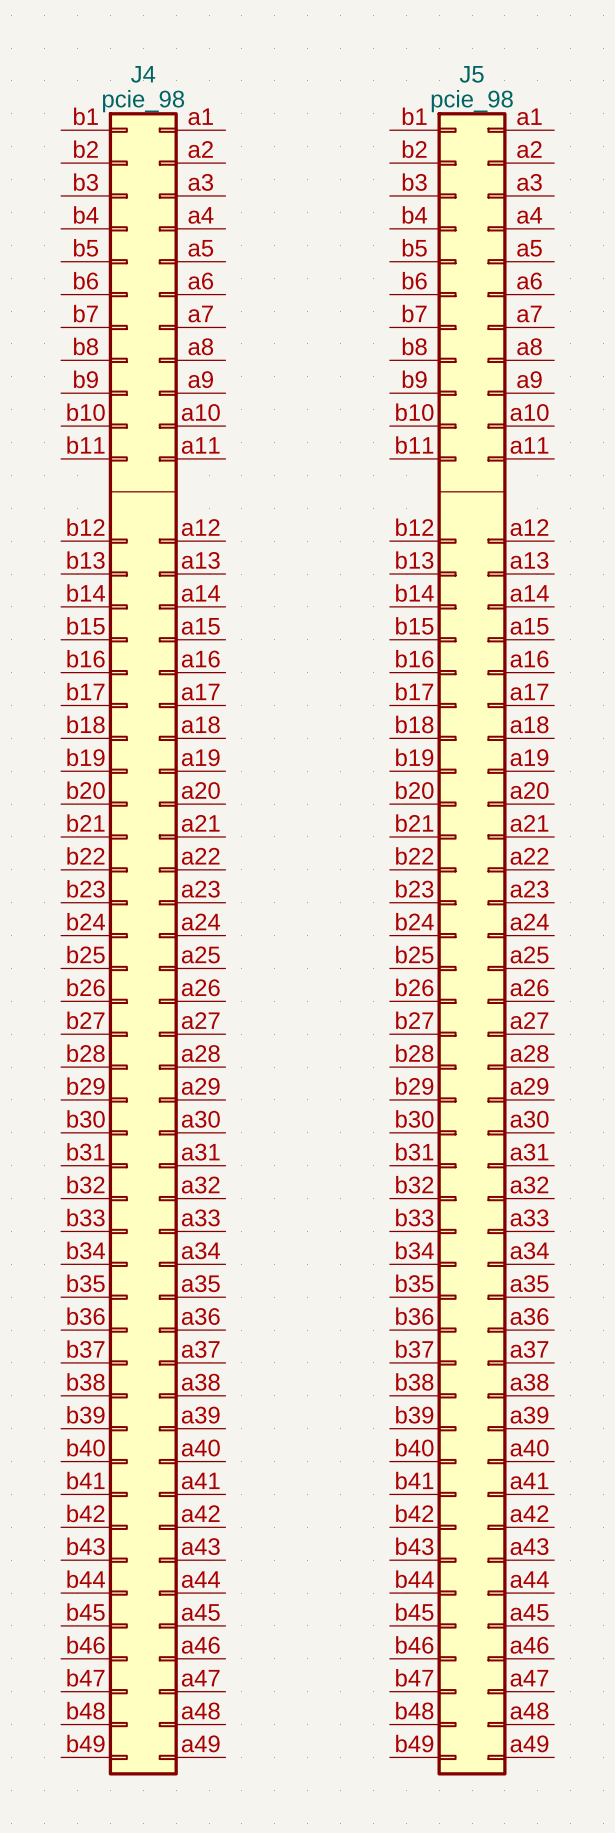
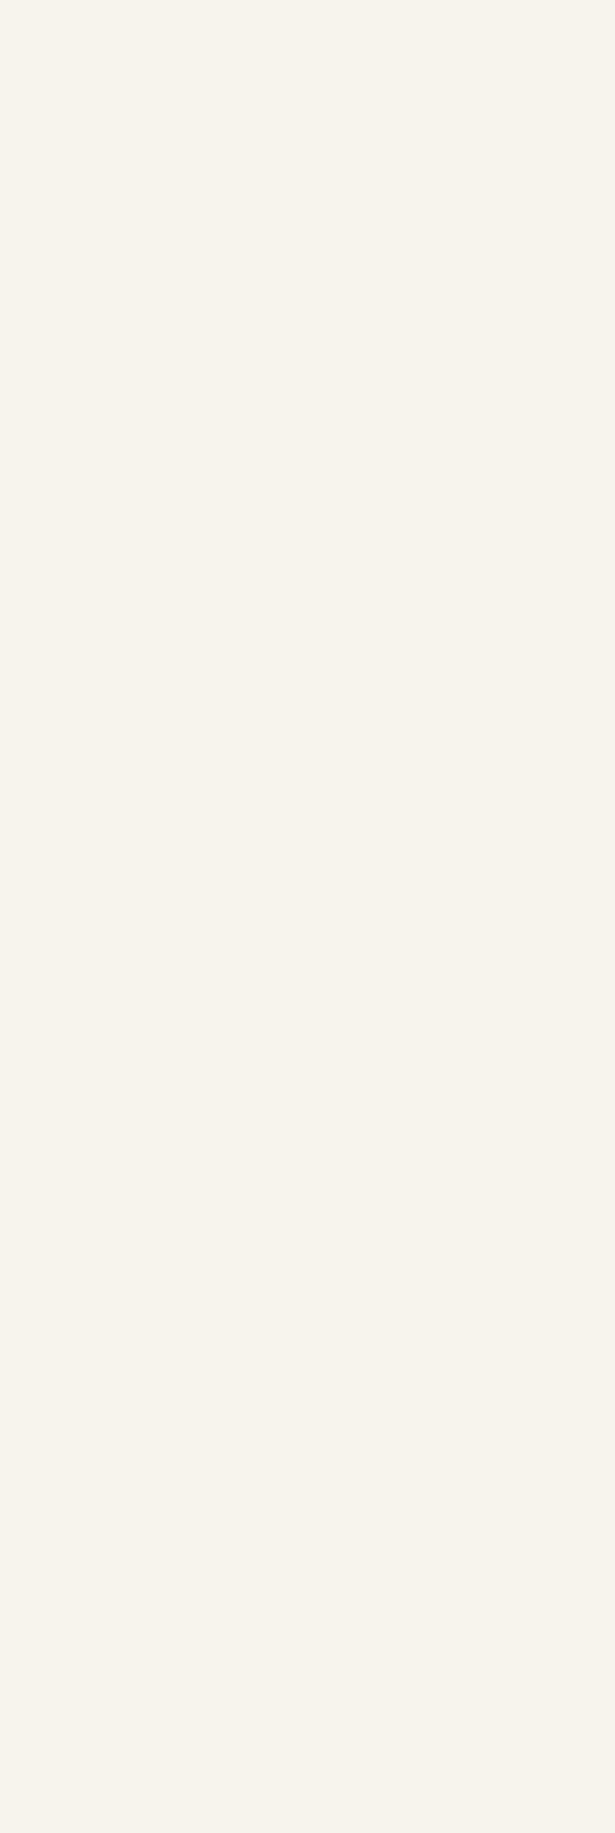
J4: pcie_98 (143, 943) -> none
J5: pcie_98 (472, 943) -> none

